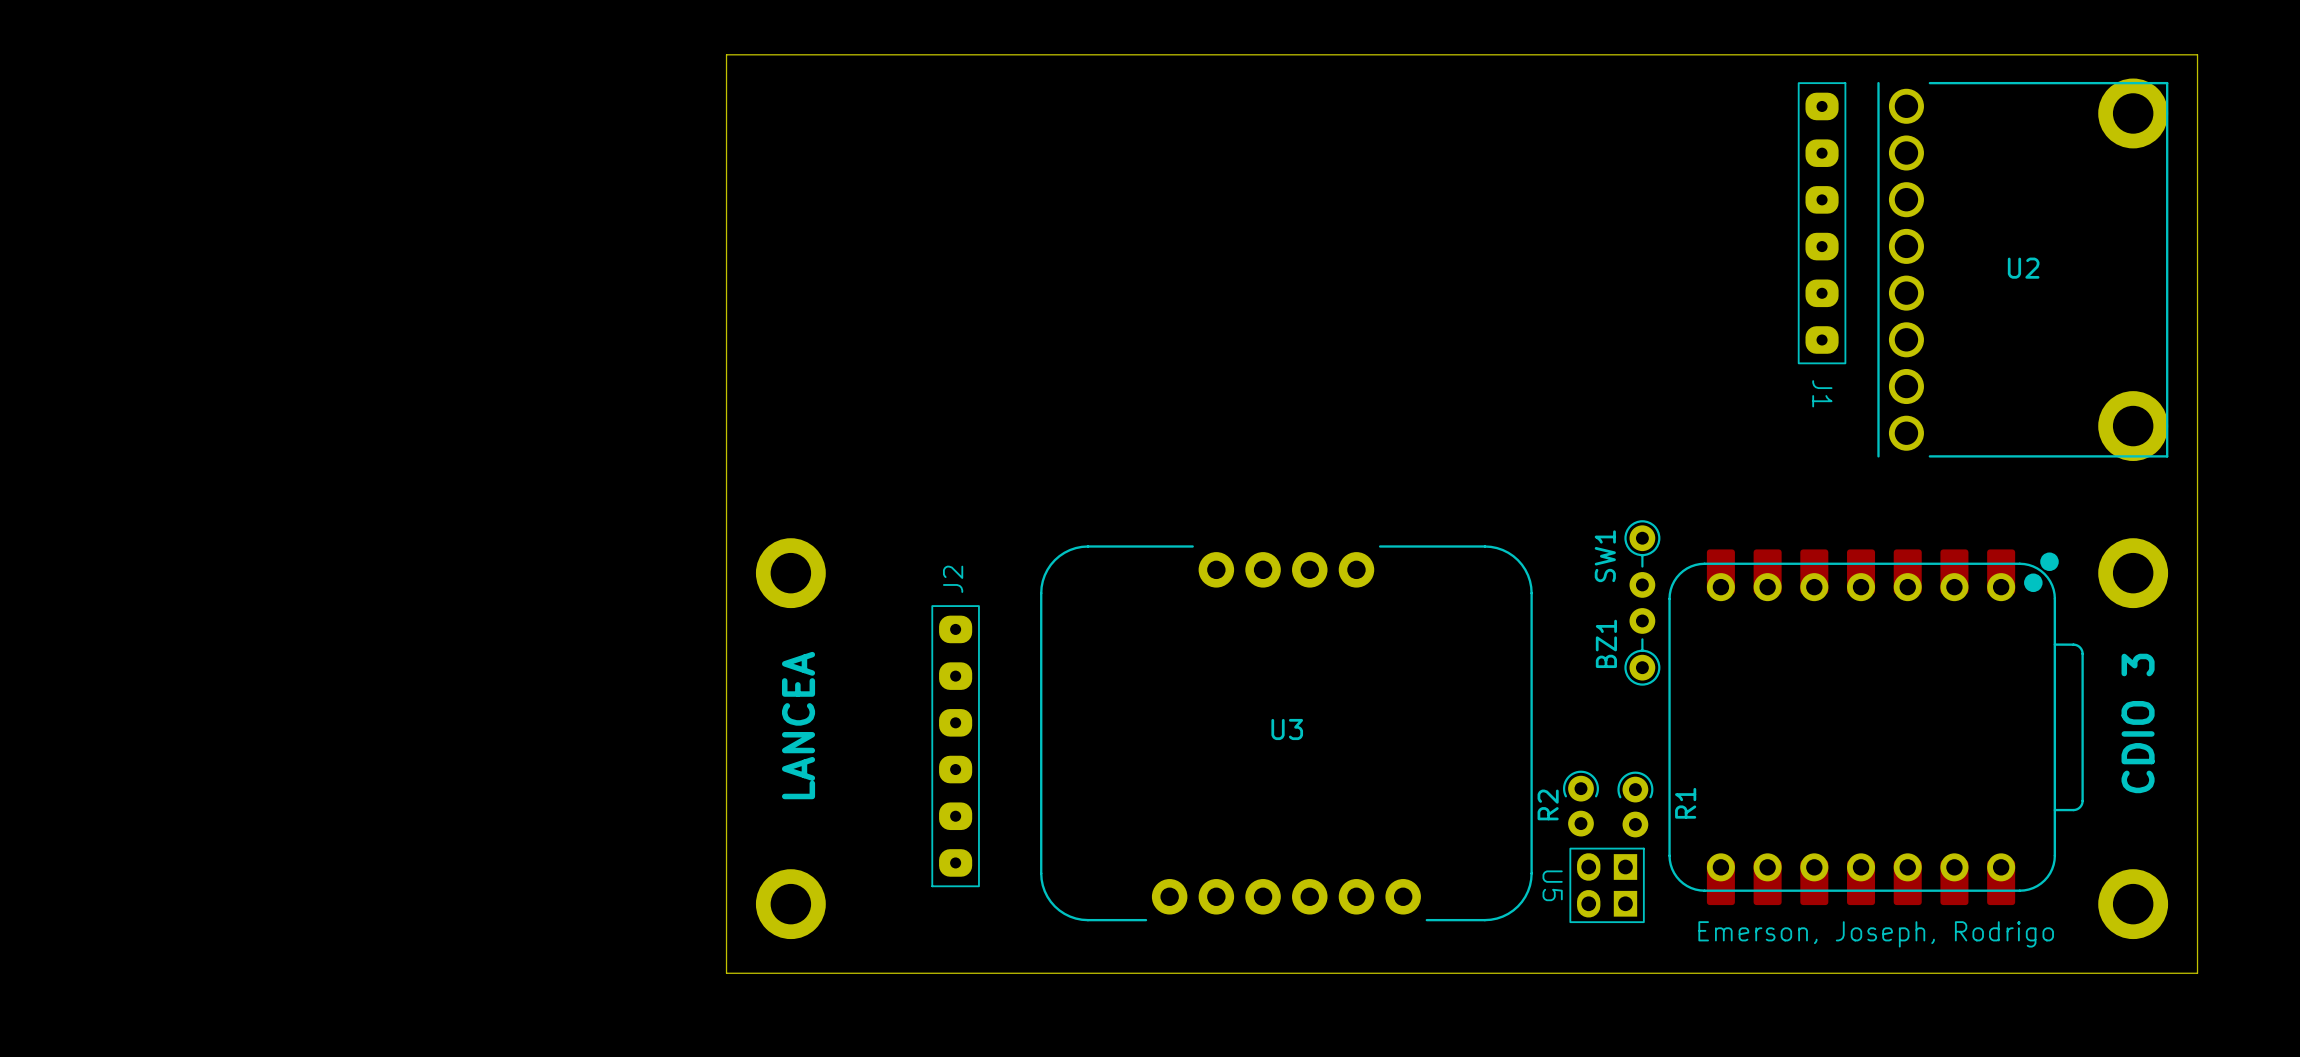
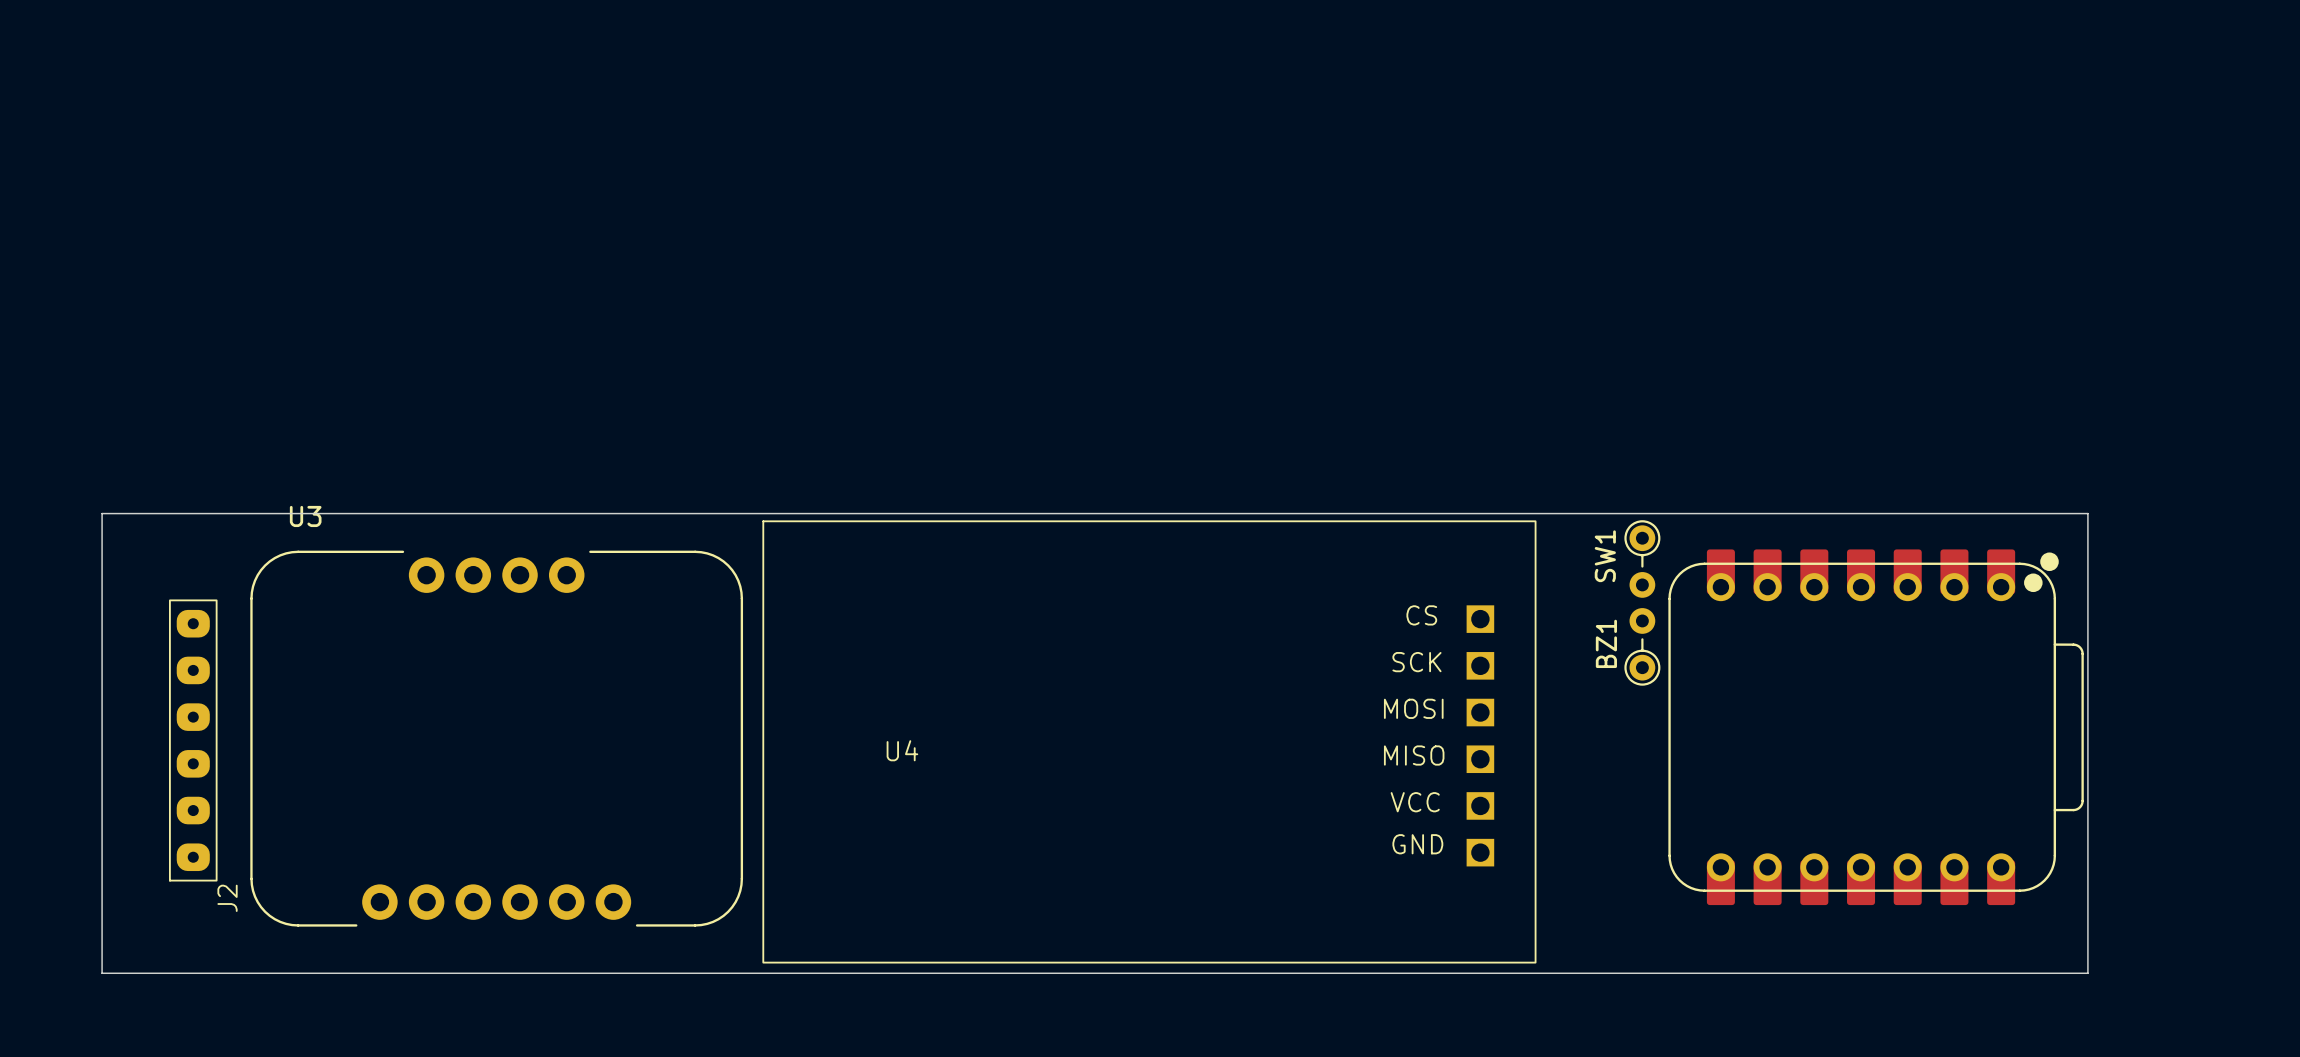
part: (2133, 113) -> none
J1: (1822, 223) -> none
U2: (2022, 269) -> none
part: (2133, 426) -> none
part: (790, 573) -> none
part: (2133, 573) -> none
J2 name position: J2 (953, 579) -> J2 (227, 898)
text: CDIO 3 (2138, 723) -> none
text: LANCEA (798, 725) -> none
U3 name position: U3 (1287, 729) -> U3 (305, 516)
U3 position: (1286, 733) -> (496, 738)
U4: none -> (1149, 741)
J2 position: (955, 746) -> (193, 740)
R2: (1580, 803) -> none
R1: (1635, 804) -> none
U5: (1607, 885) -> none
part: (790, 904) -> none
part: (2133, 904) -> none
text: Emerson, Joseph, Rodrigo (1876, 934) -> none
board edge: (726, 973) (726, 54) (2197, 54) (2197, 973) (2087, 973) -> (726, 973) (102, 973) (102, 513) (2087, 513) (2087, 973)

